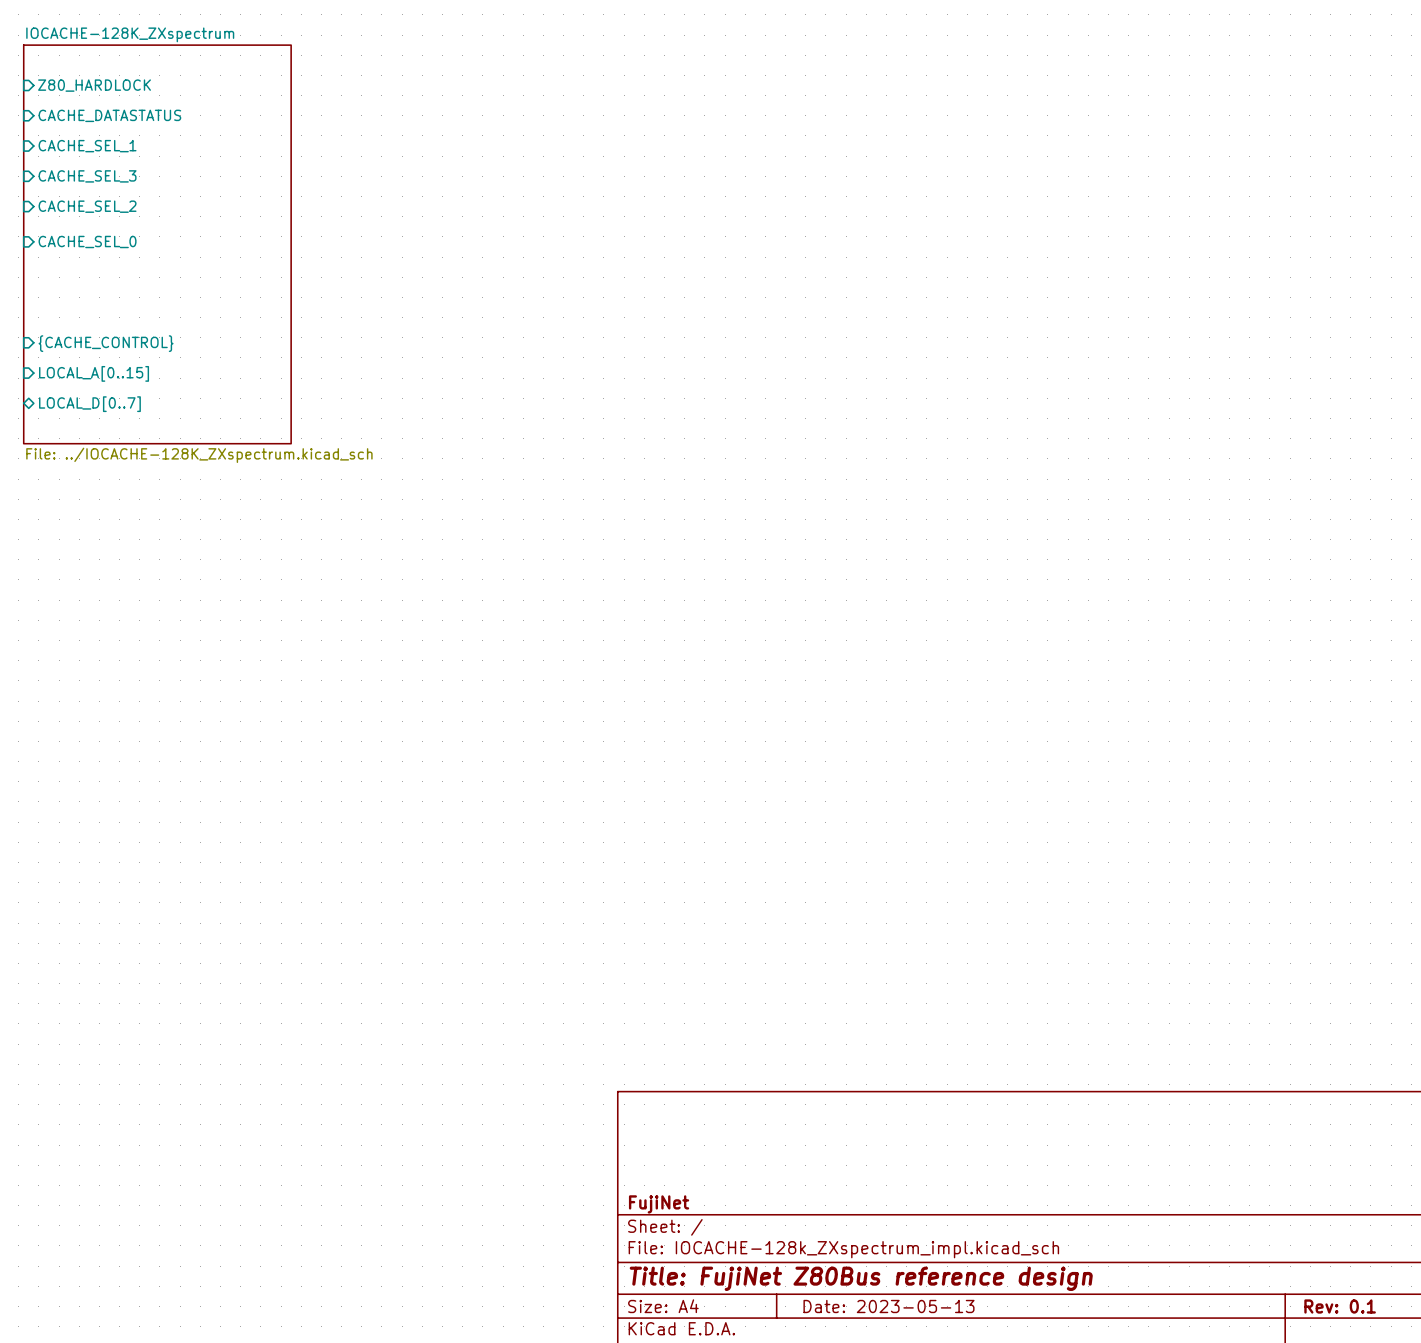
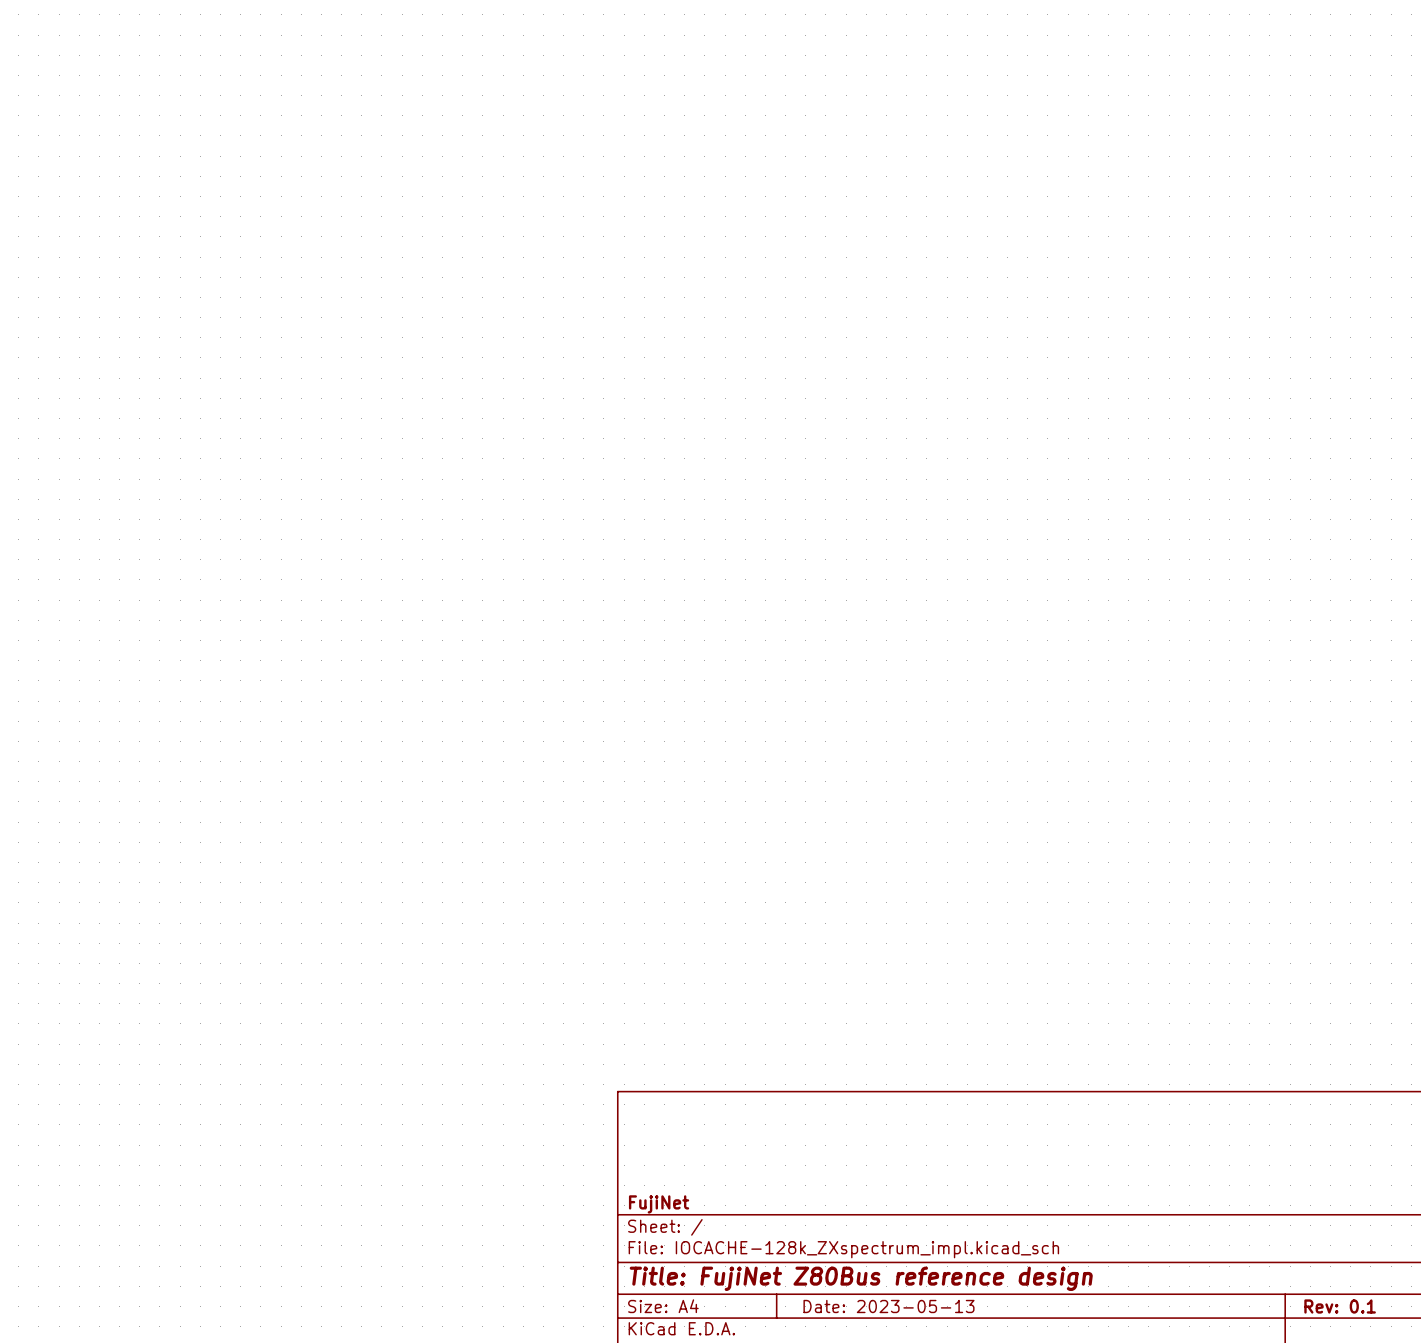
sheet pin: Z80_HARDLOCK (94, 85) -> none
sheet pin: CACHE_DATASTATUS (109, 115) -> none
sheet pin: CACHE_SEL_1 (87, 146) -> none
sheet pin: CACHE_SEL_3 (87, 176) -> none
sheet pin: CACHE_SEL_2 (87, 206) -> none
sheet pin: CACHE_SEL_0 (87, 241) -> none
sheet IOCACHE-128K_ZXspectrum: File: ../IOCACHE-128K_ZXspectrum.kicad_sch (157, 244) -> none
sheet pin: {CACHE_CONTROL} (106, 343) -> none
sheet pin: LOCAL_A[0..15] (94, 373) -> none
sheet pin: LOCAL_D[0..7] (89, 404) -> none

